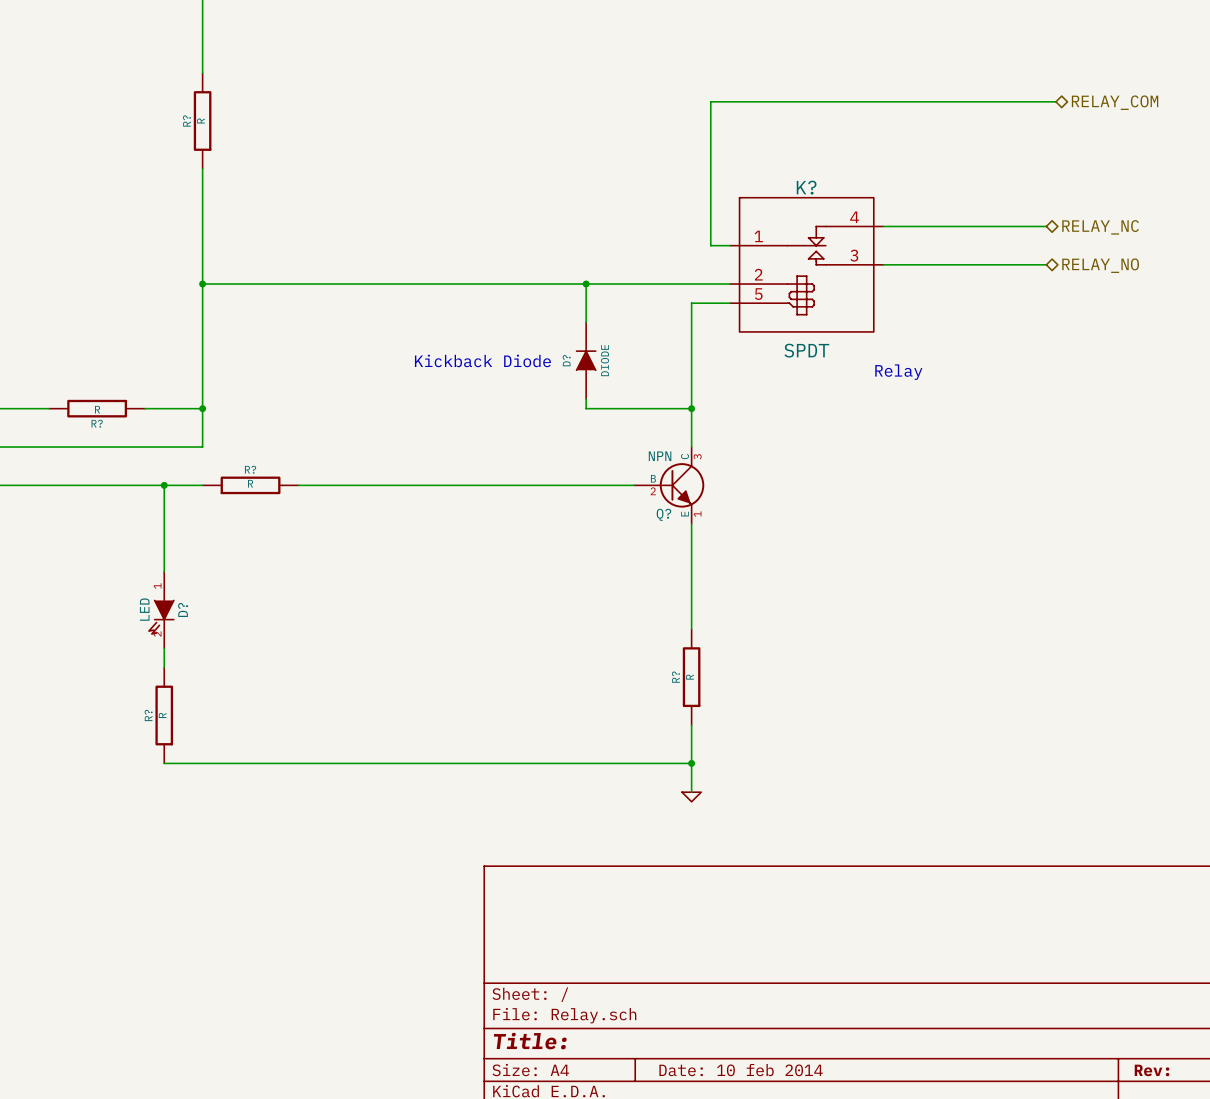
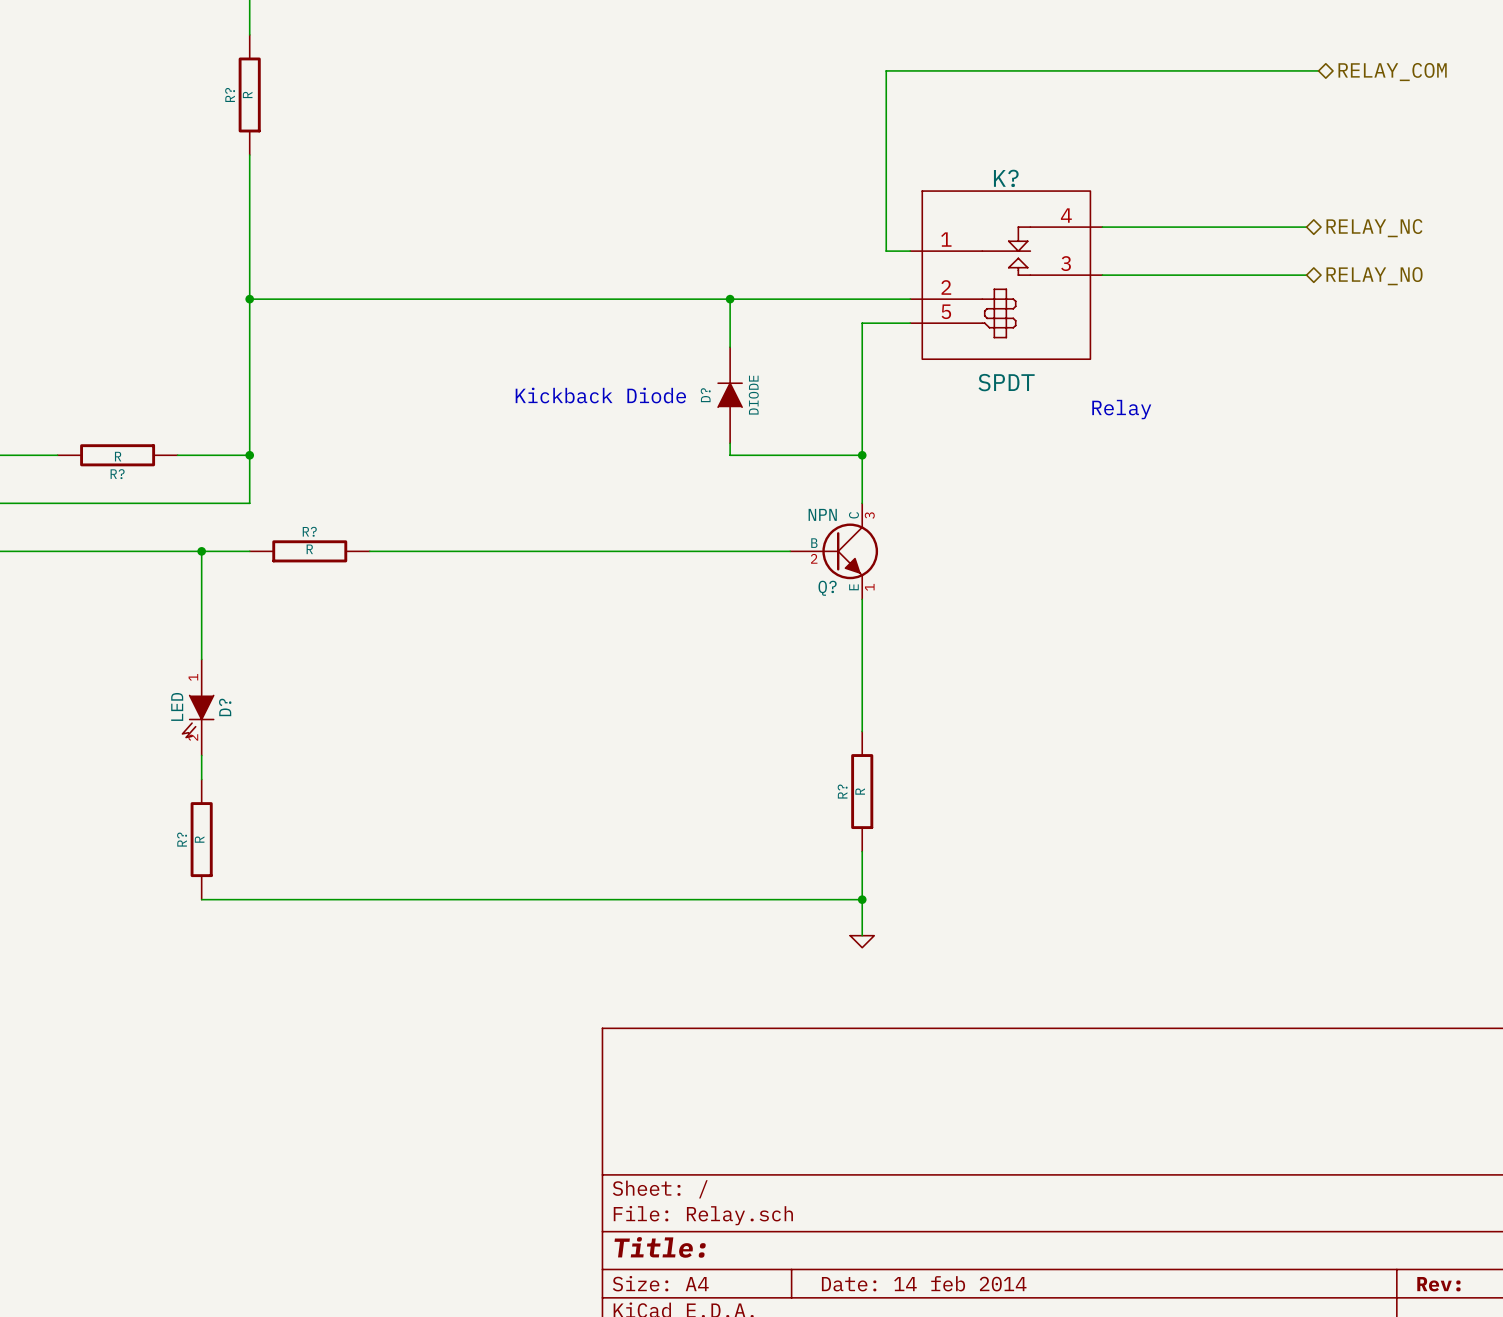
title block: Date: 10 feb 2014 (741, 1070) -> Date: 14 feb 2014 (924, 1283)

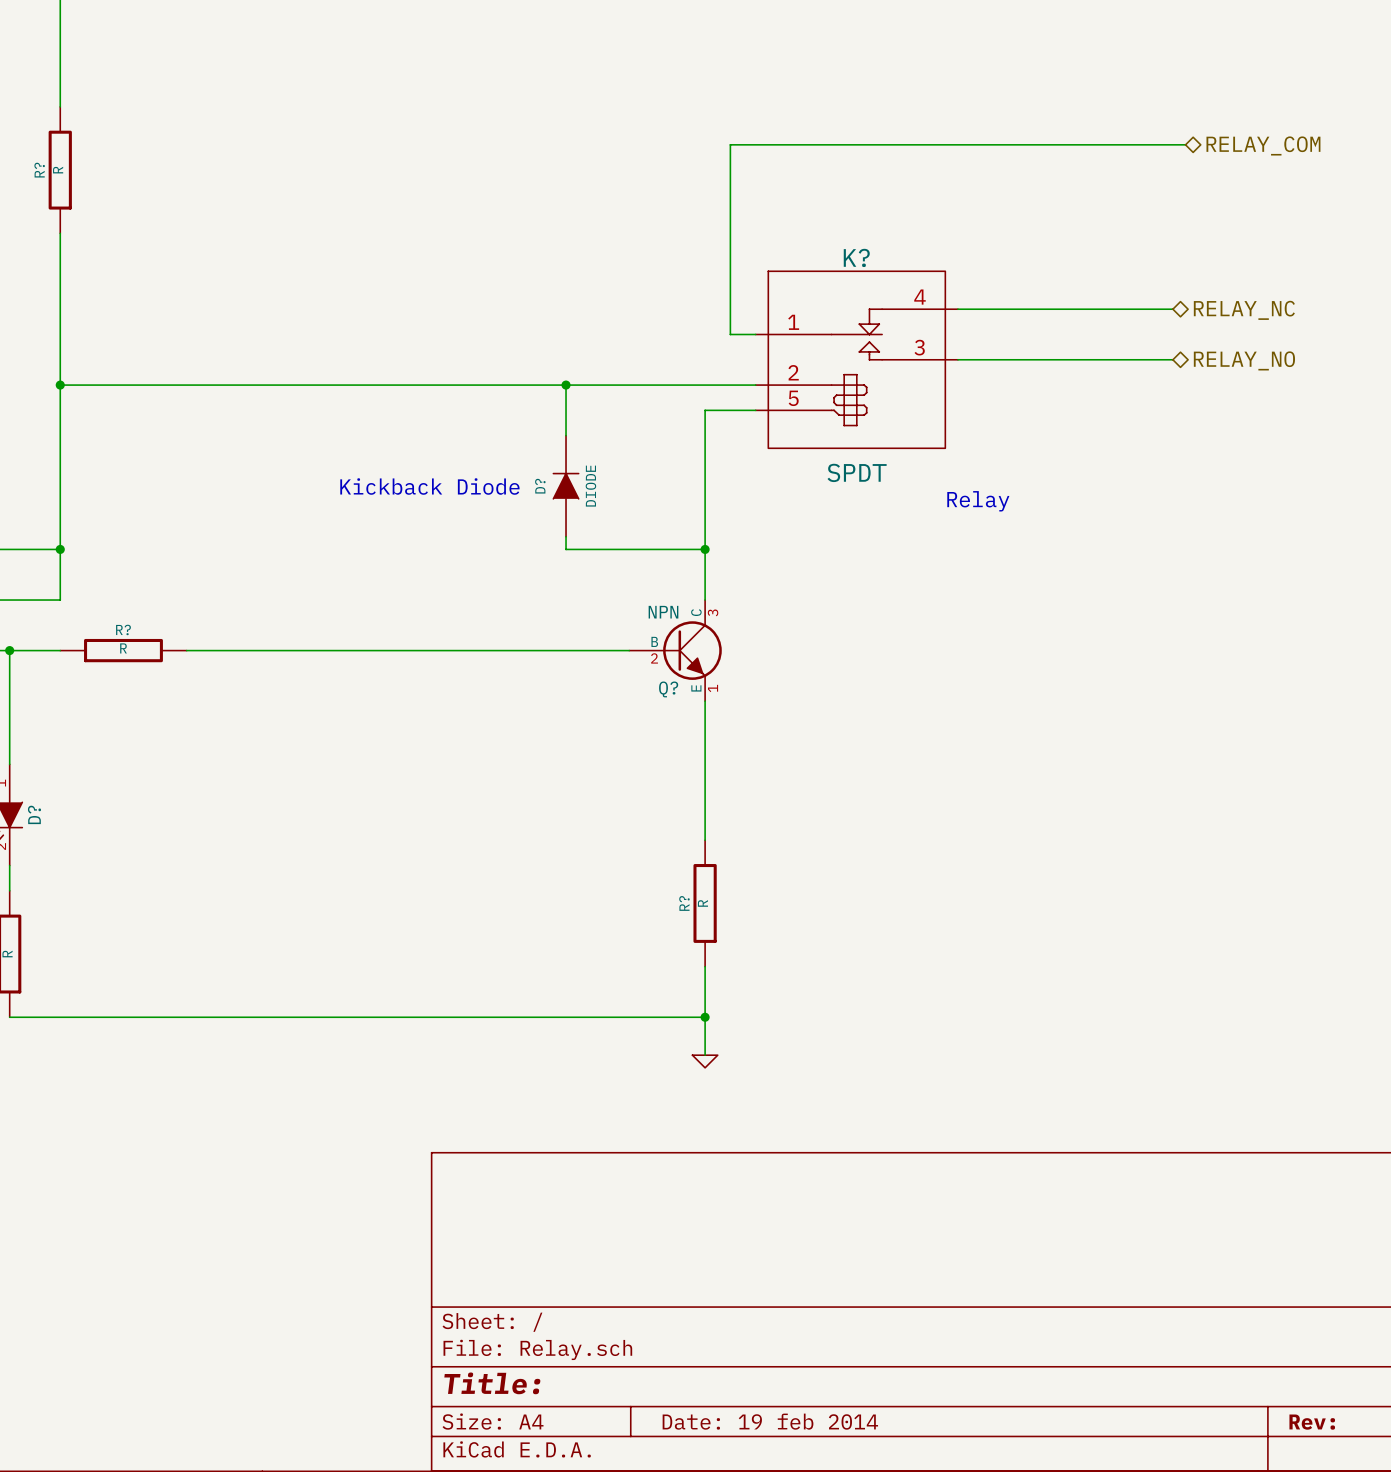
title block: Date: 14 feb 2014 (924, 1283) -> Date: 19 feb 2014 (770, 1421)

